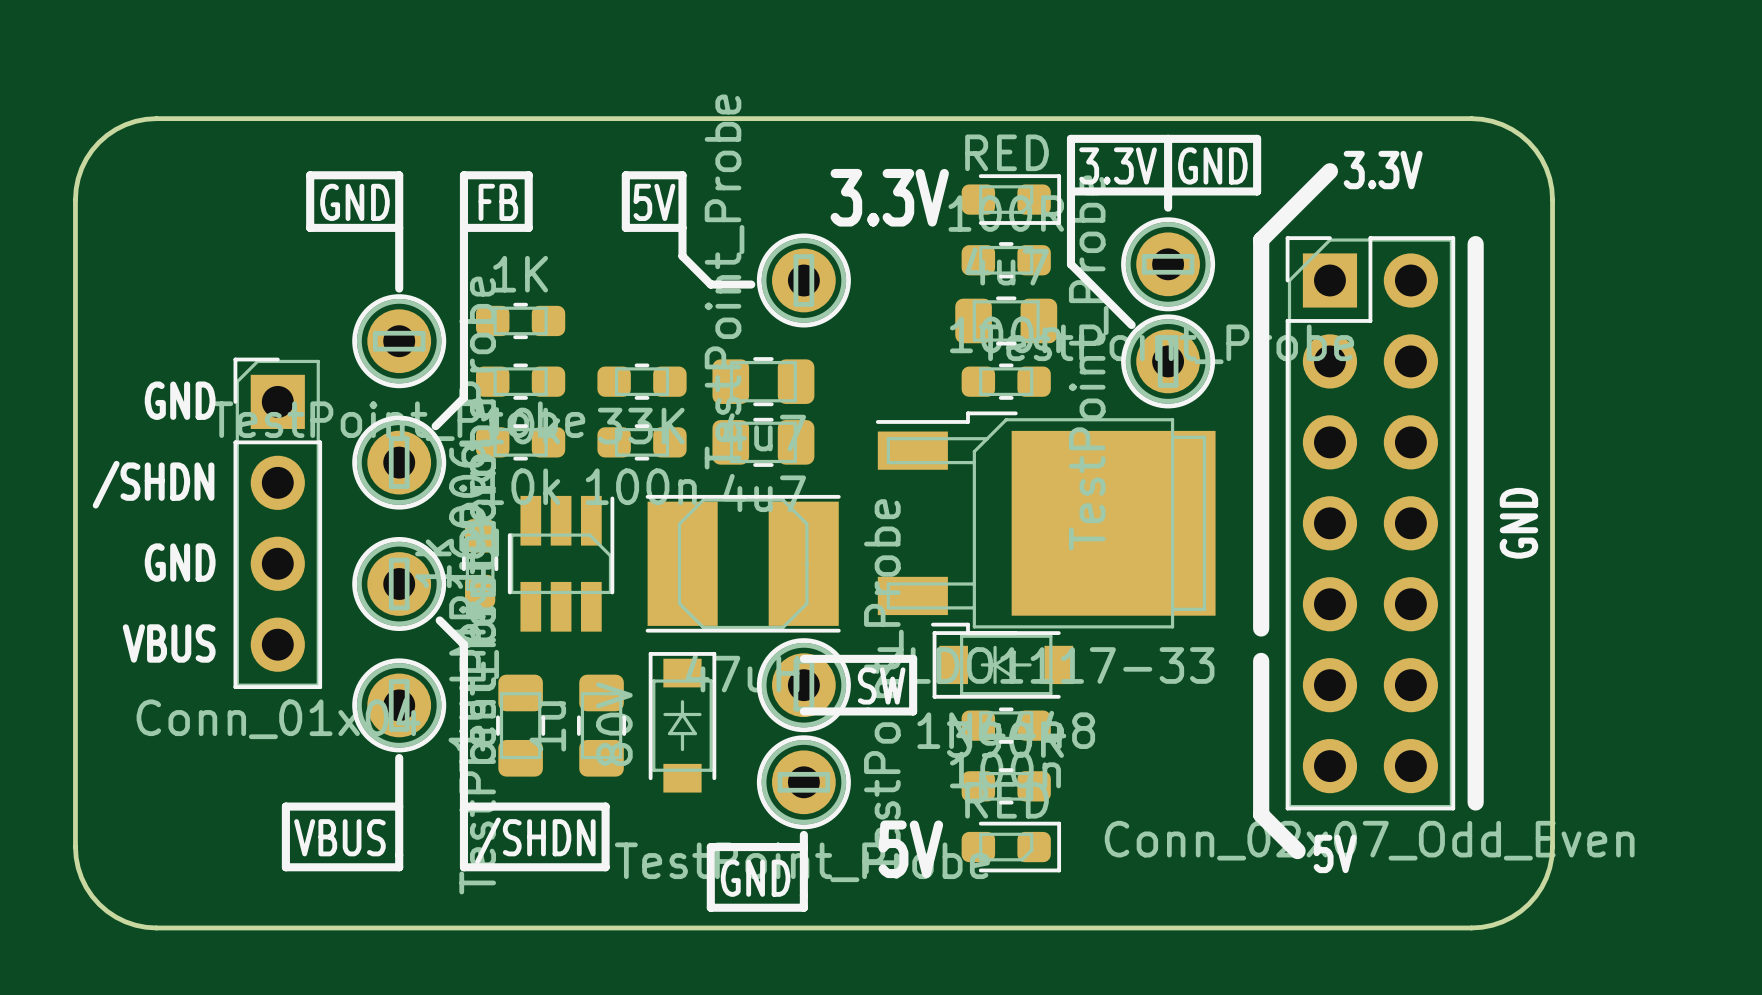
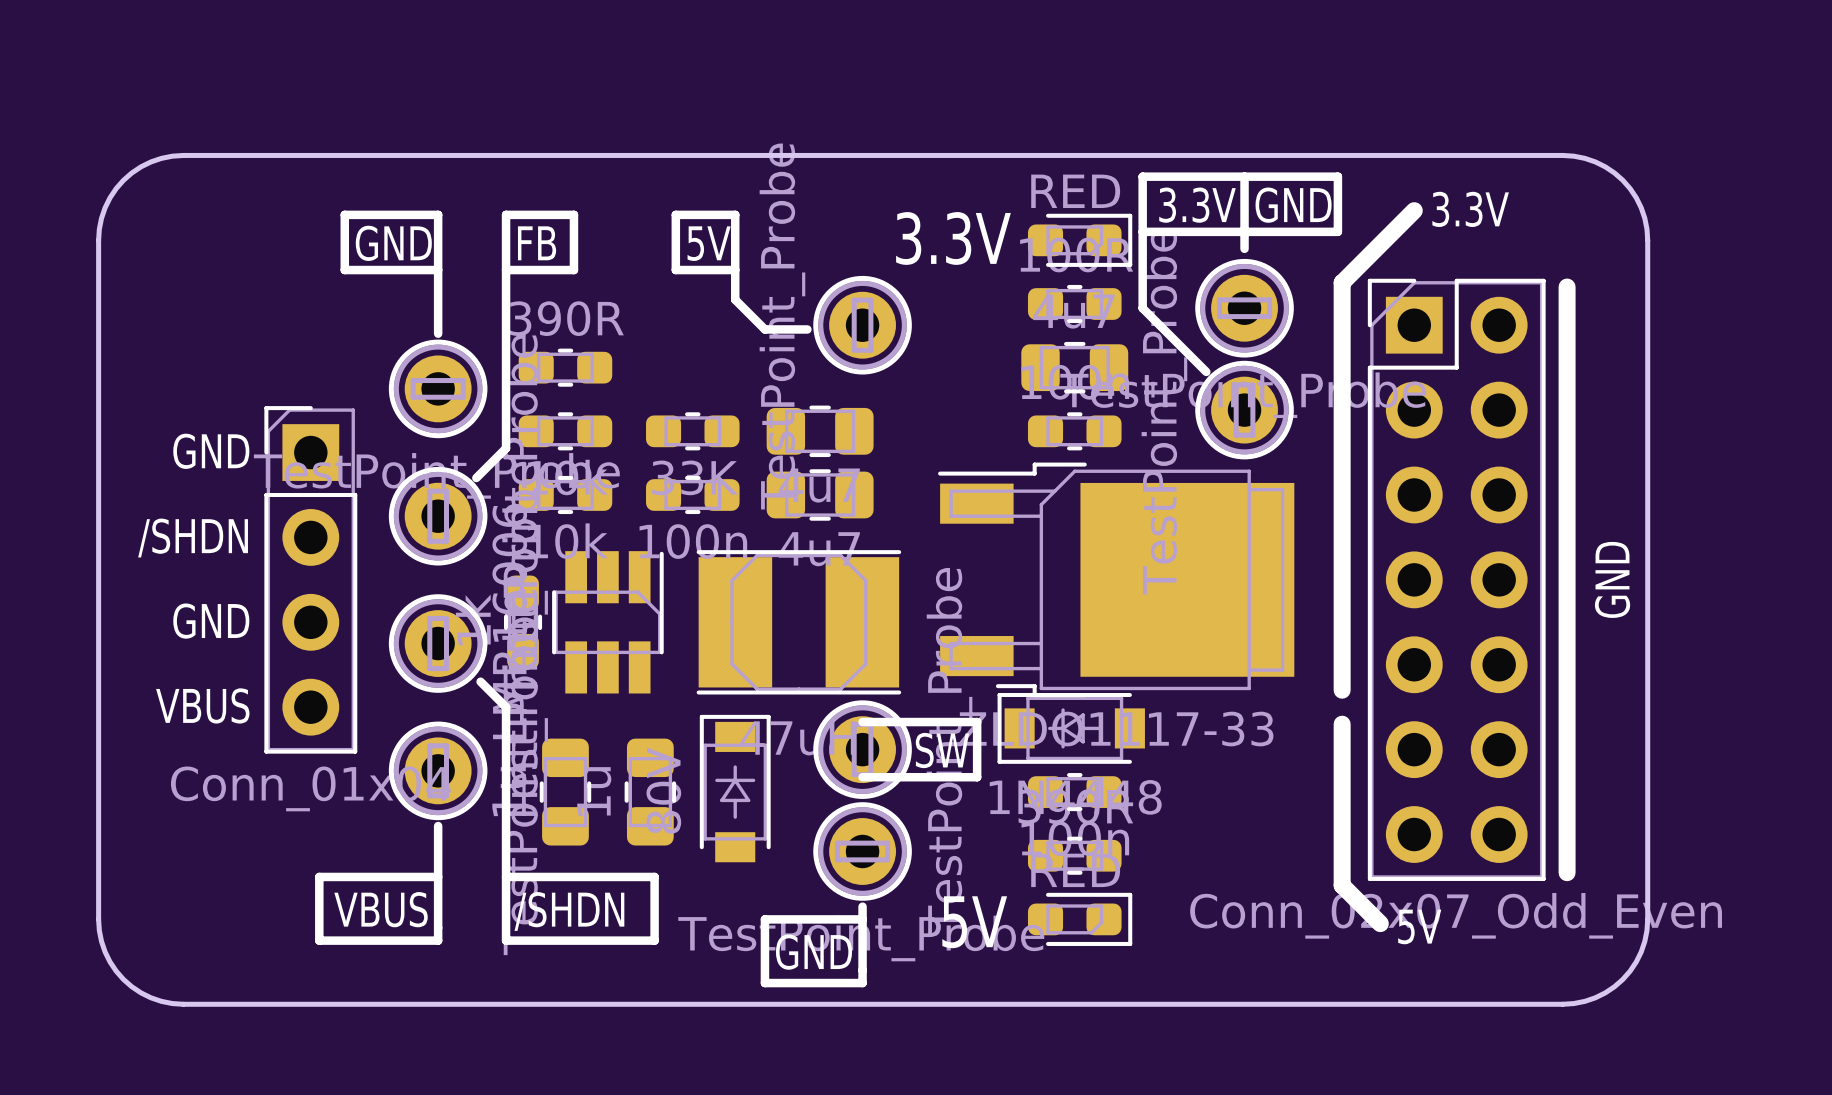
part value: 1K (520, 274) -> 390R (566, 318)

